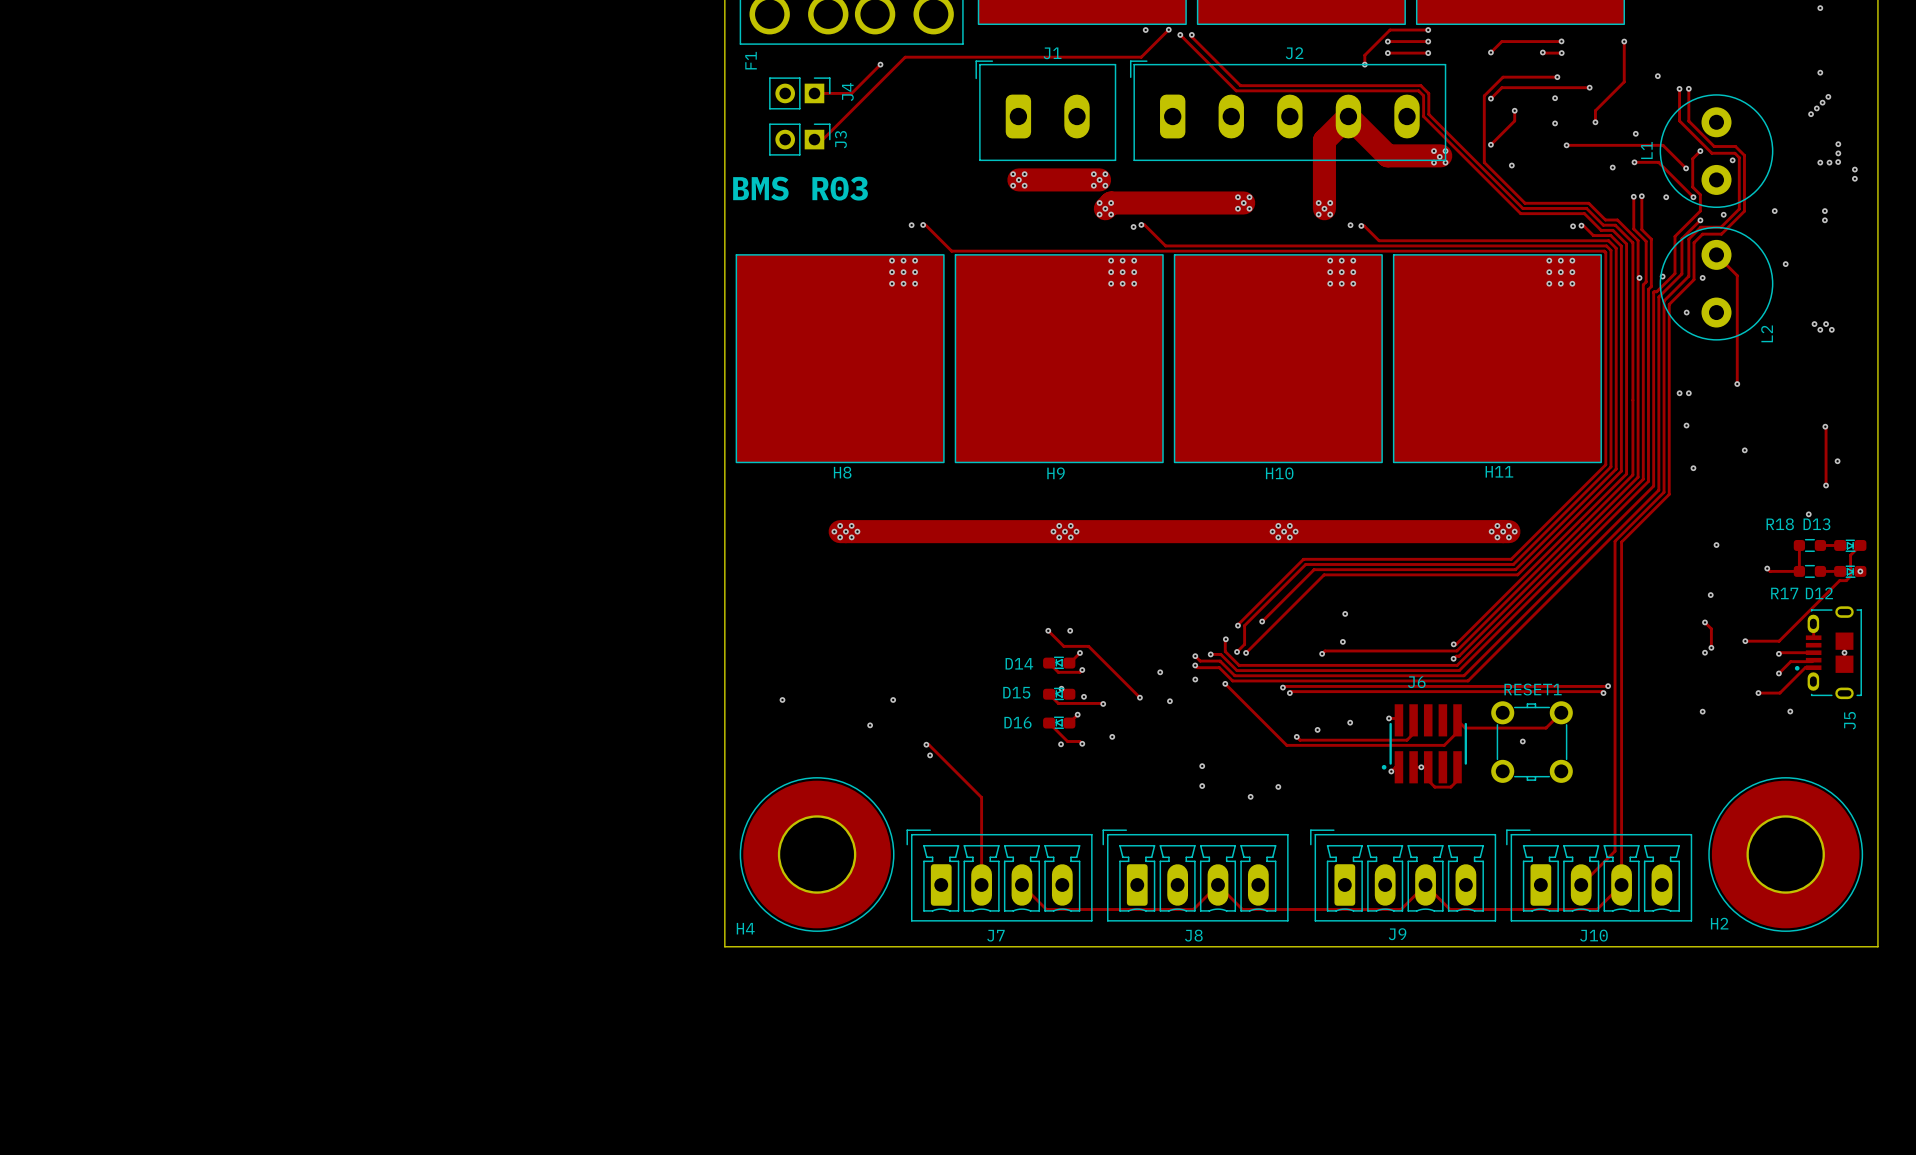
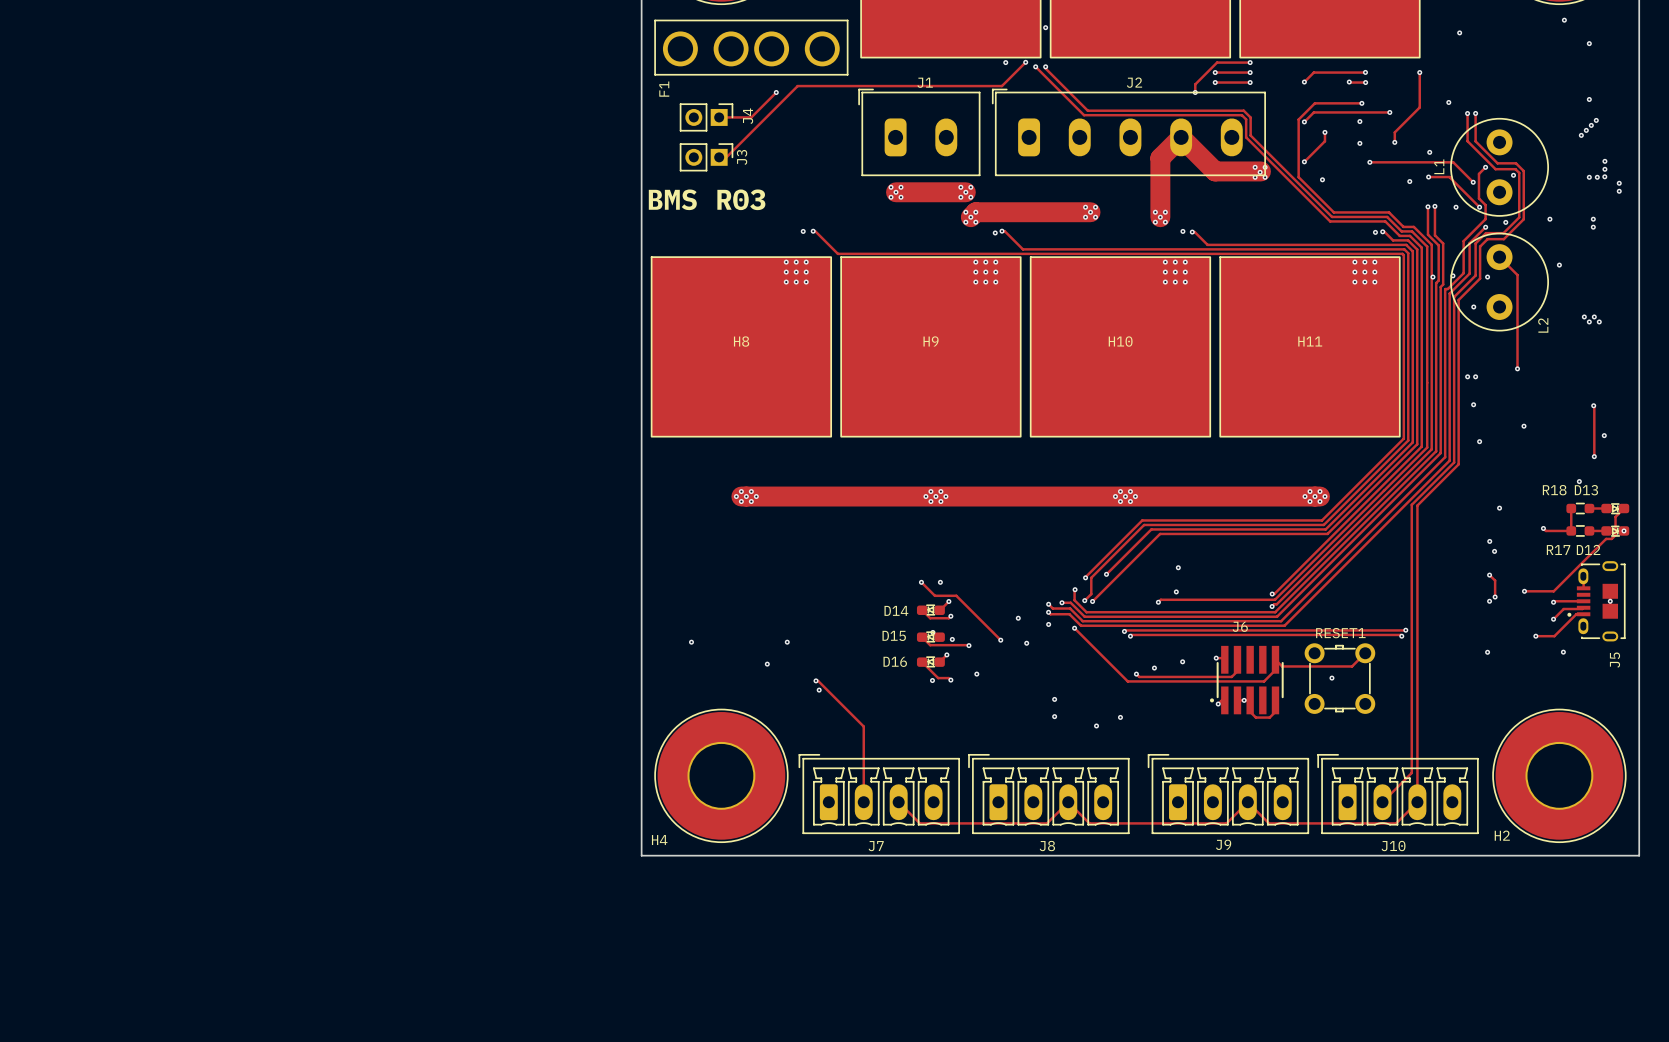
H11 name position: H11 (1499, 471) -> H11 (1310, 341)
H8 name position: H8 (842, 472) -> H8 (741, 341)
H9 name position: H9 (1056, 473) -> H9 (931, 341)
H10 name position: H10 (1279, 473) -> H10 (1120, 341)
via: none -> (1489, 541)

